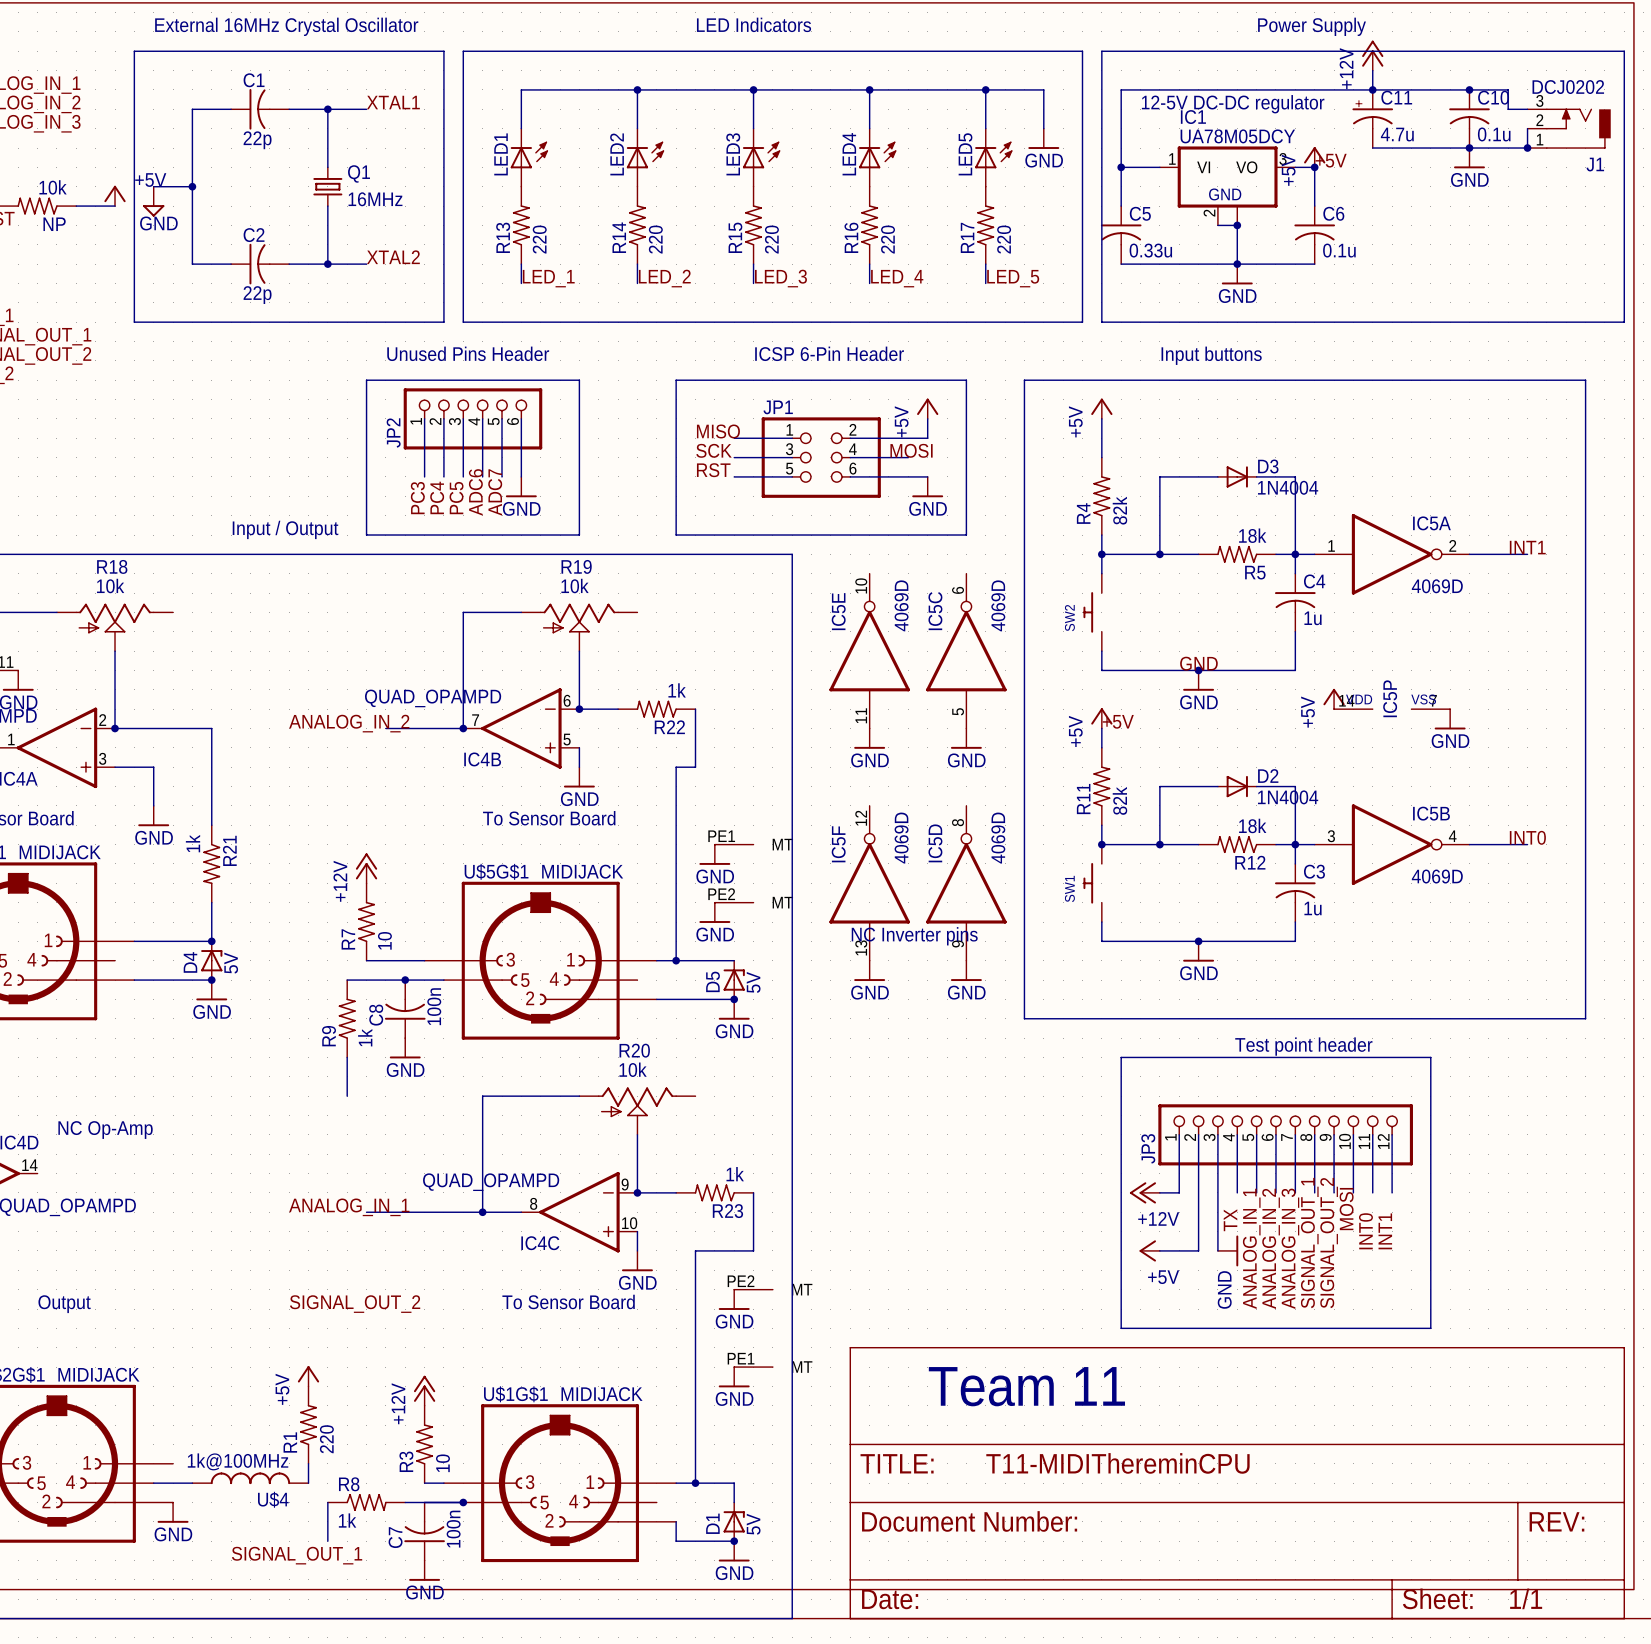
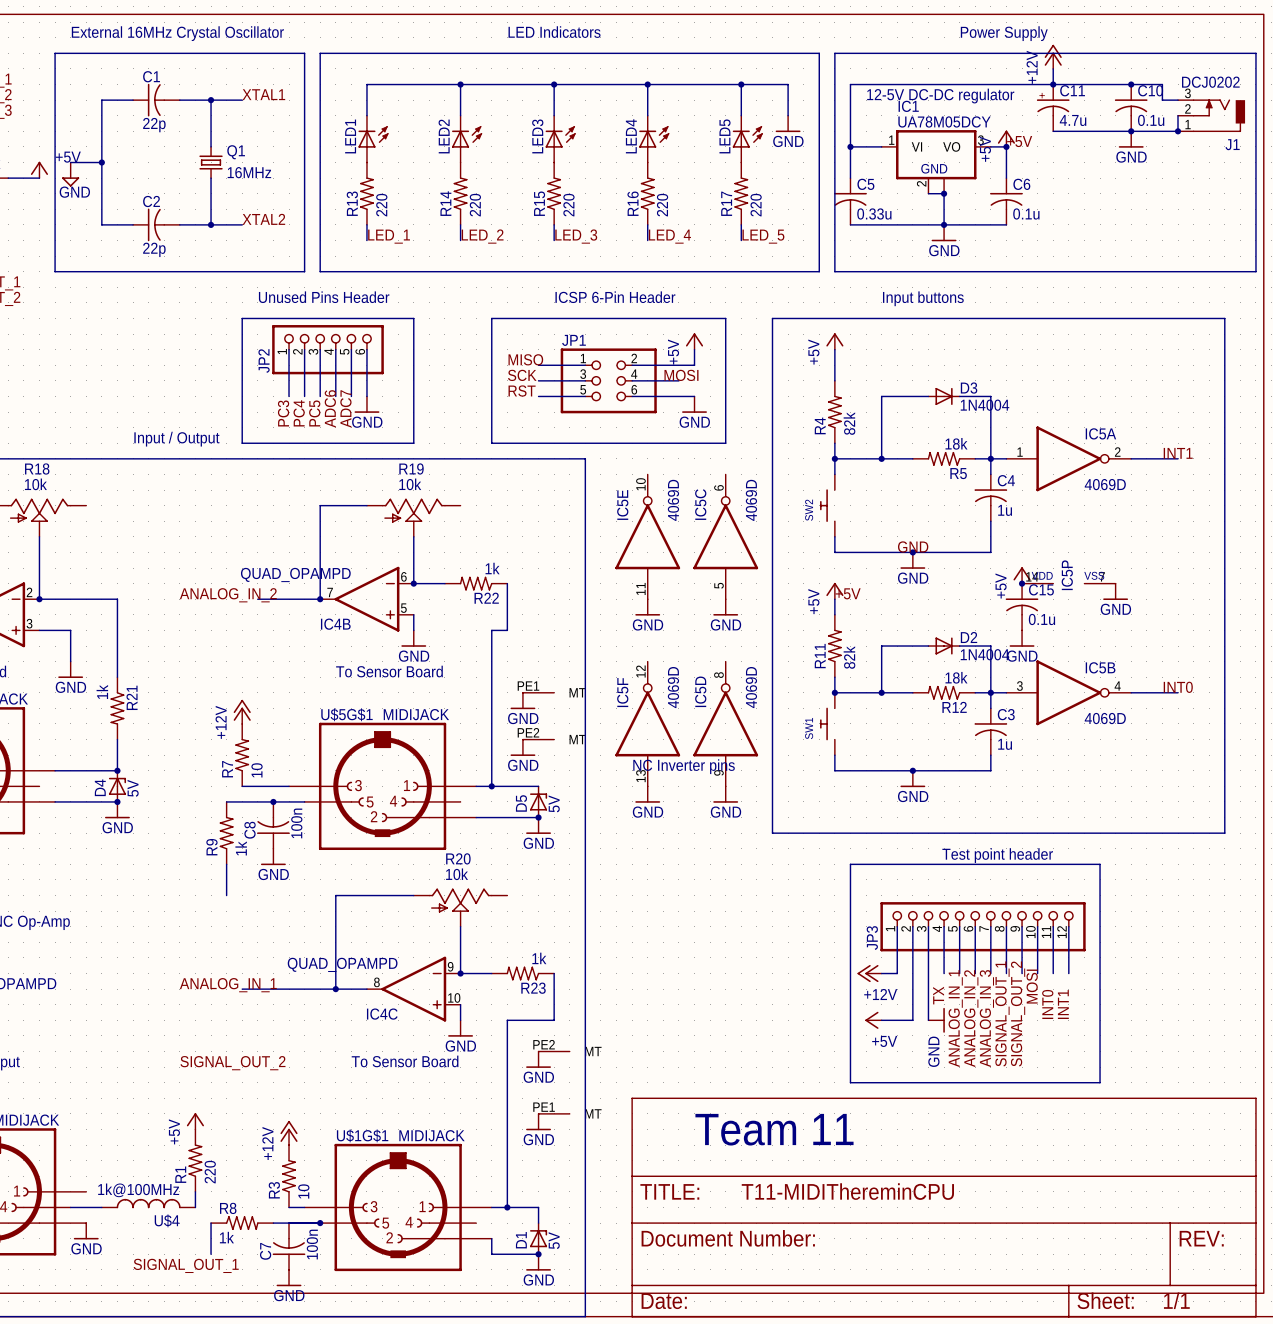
junction: none -> (1022, 583)
C15: none -> 0.1u (1022, 607)
power symbol: none -> GND (1022, 638)

